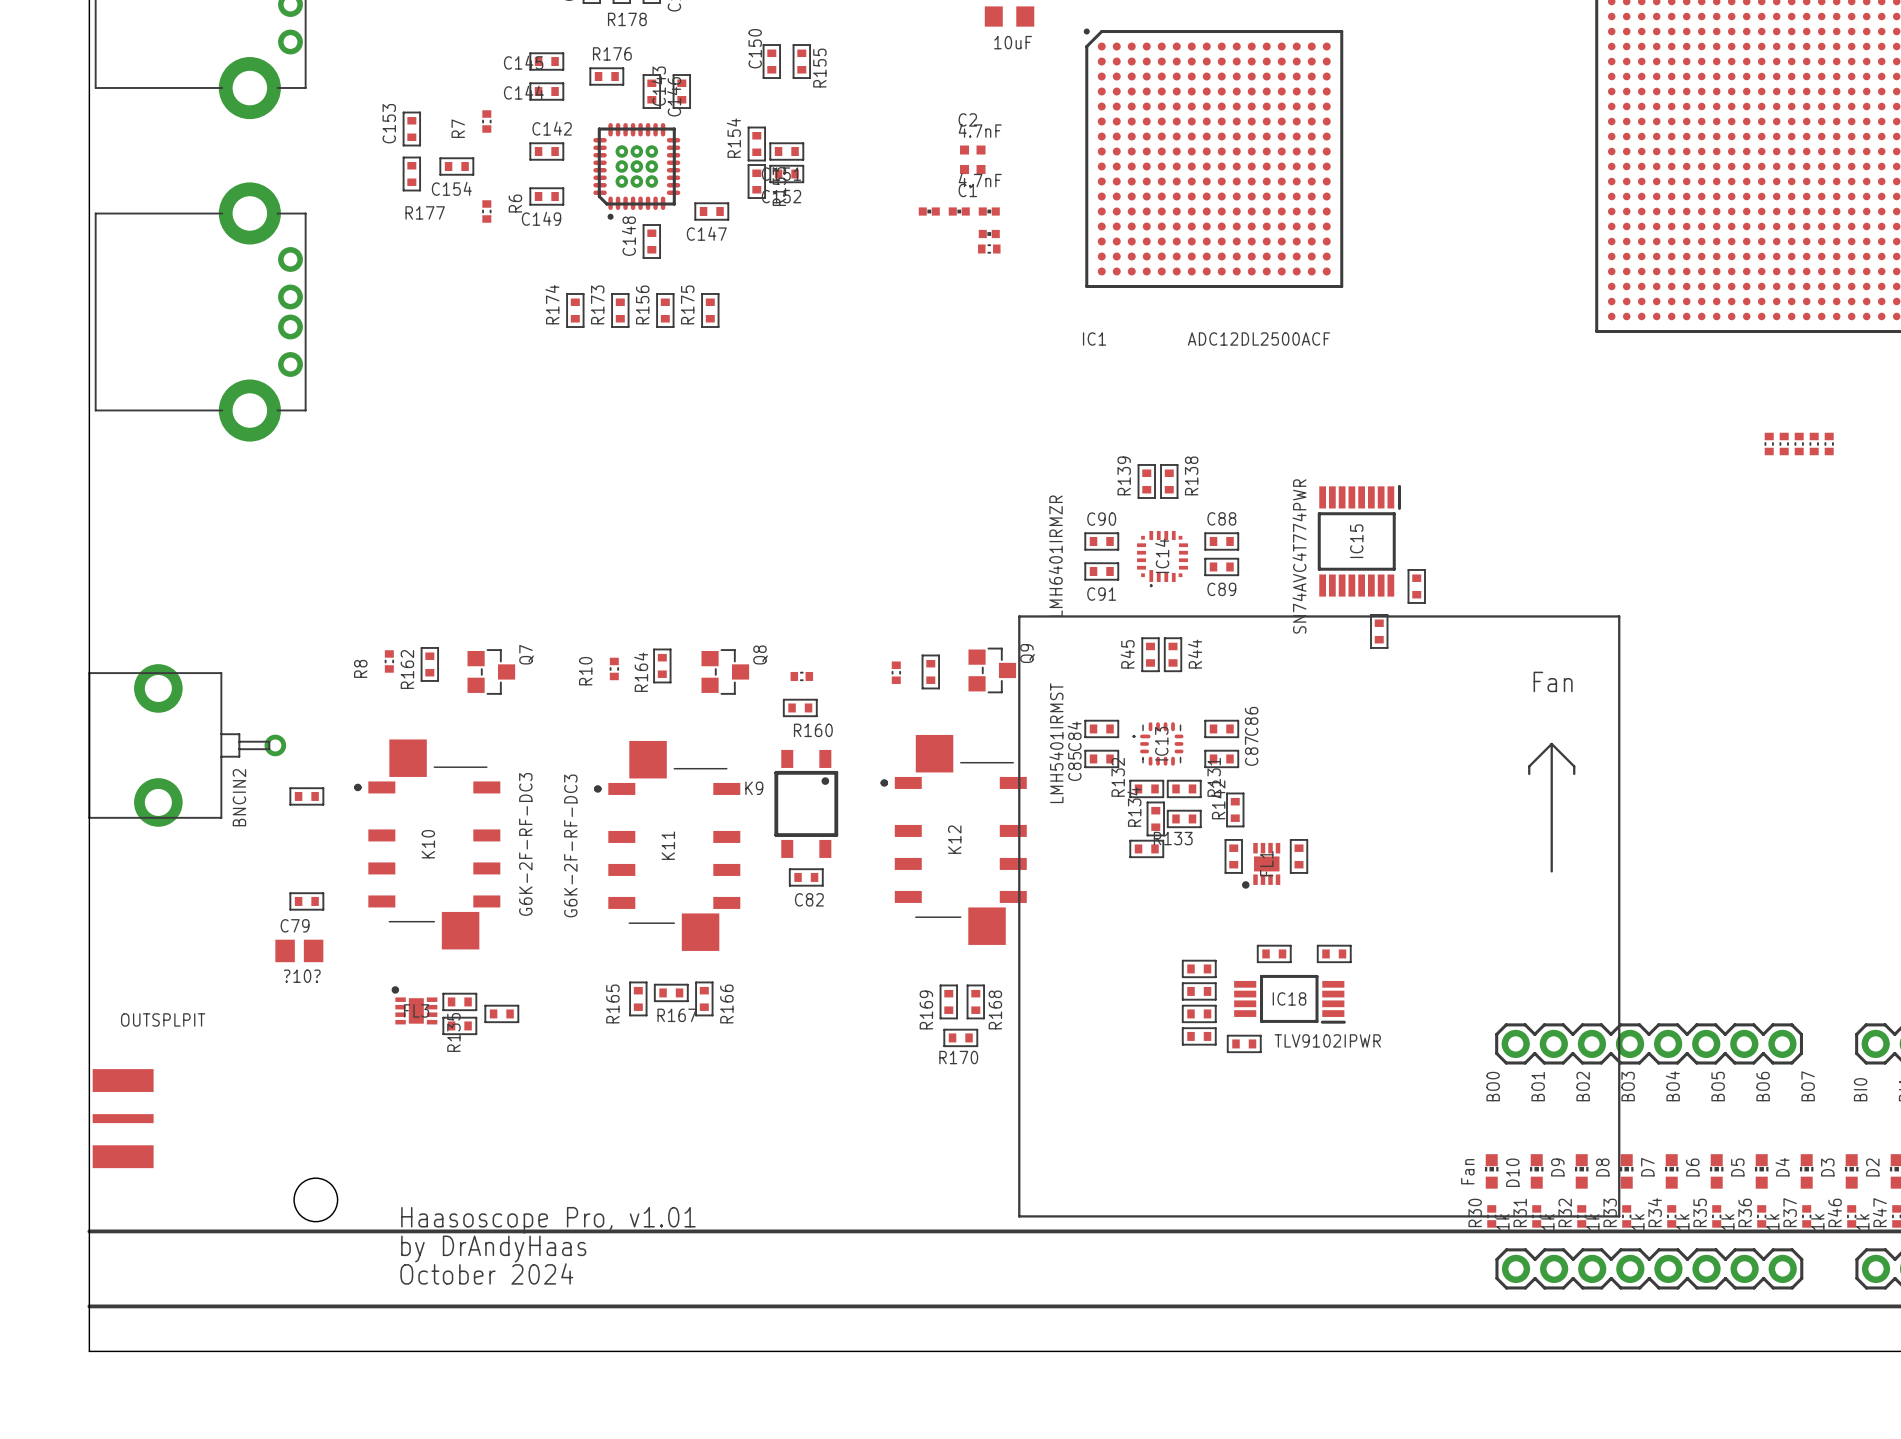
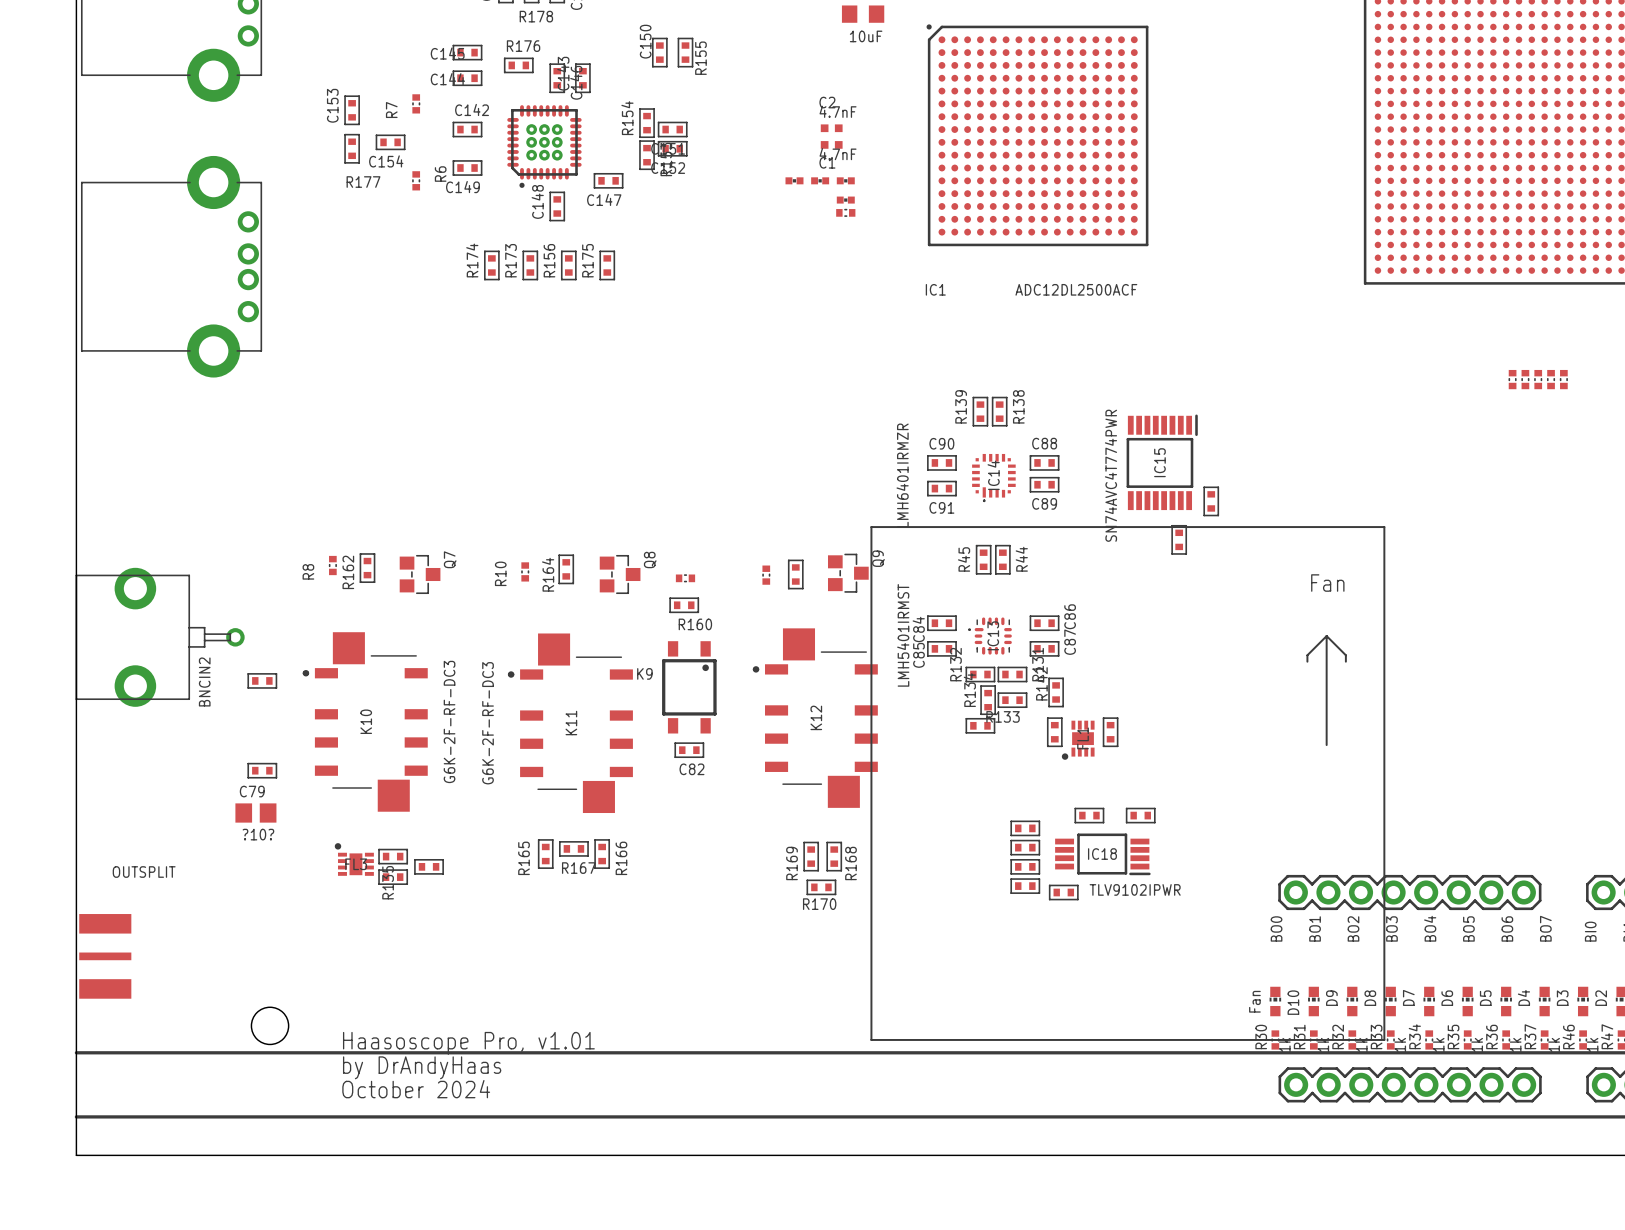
OUTSPLPIT name: OUTSPLPIT (163, 1019) -> OUTSPLIT (144, 872)

